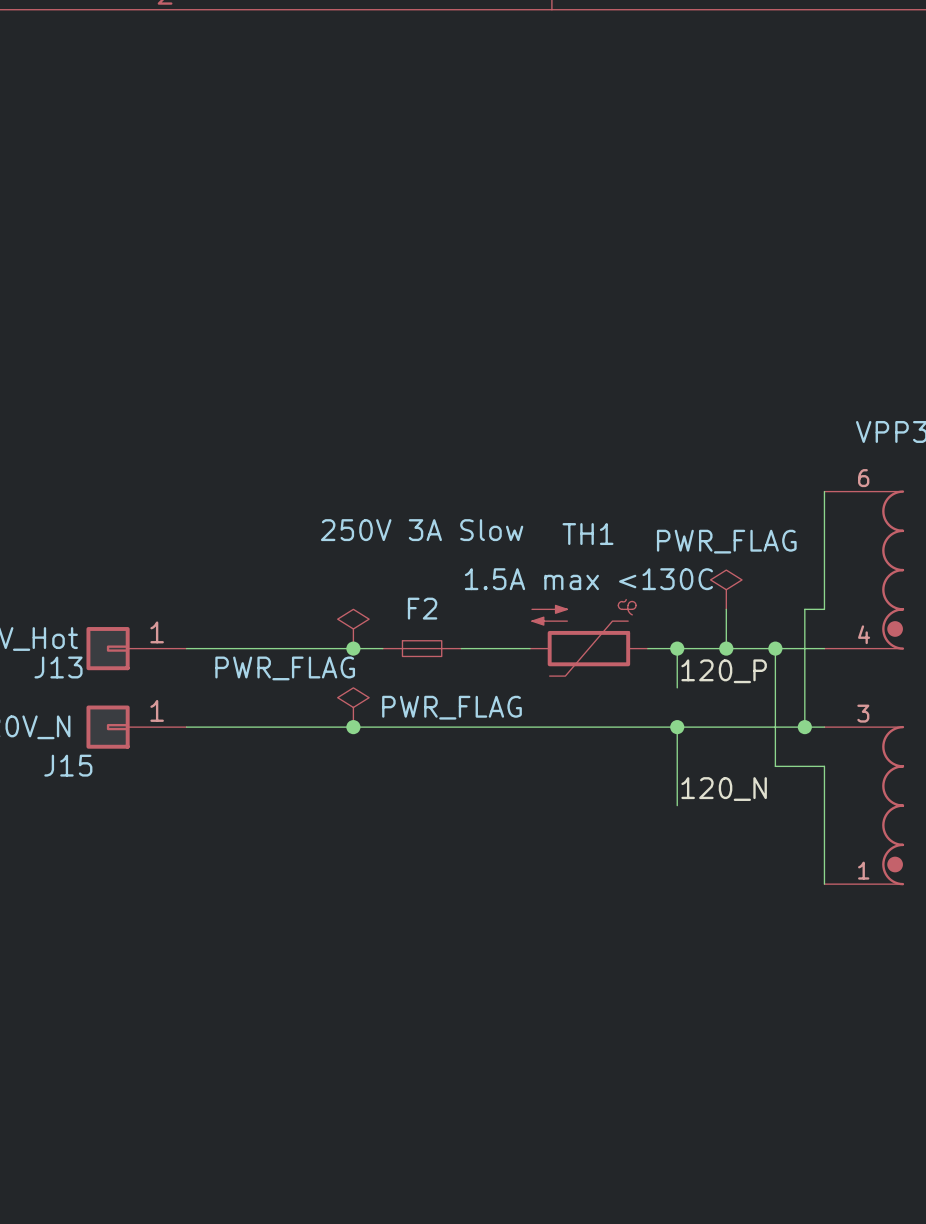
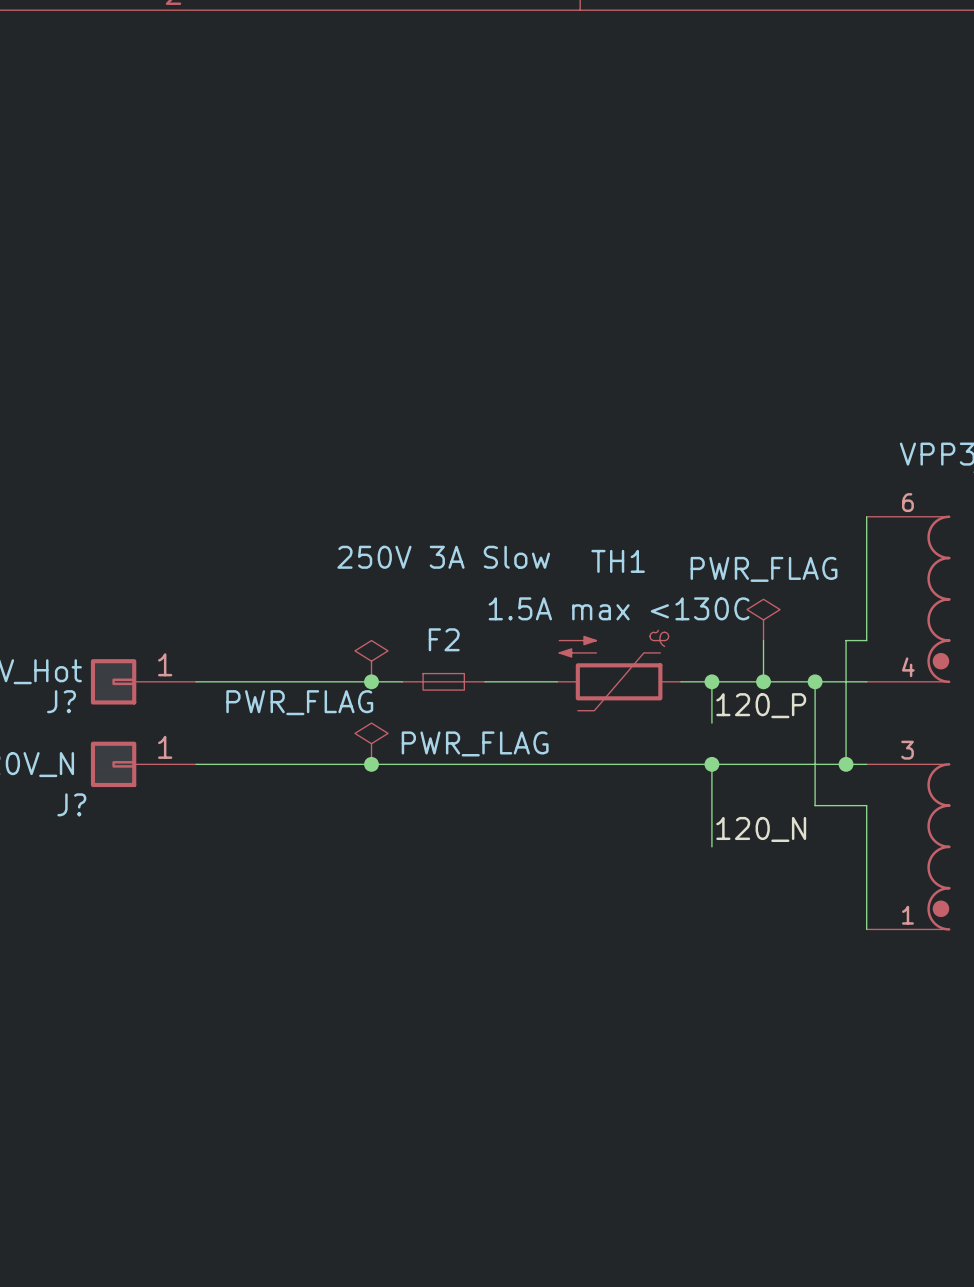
J13 name: J13 (58, 667) -> J? (61, 701)
J15 name: J15 (68, 765) -> J? (71, 804)

